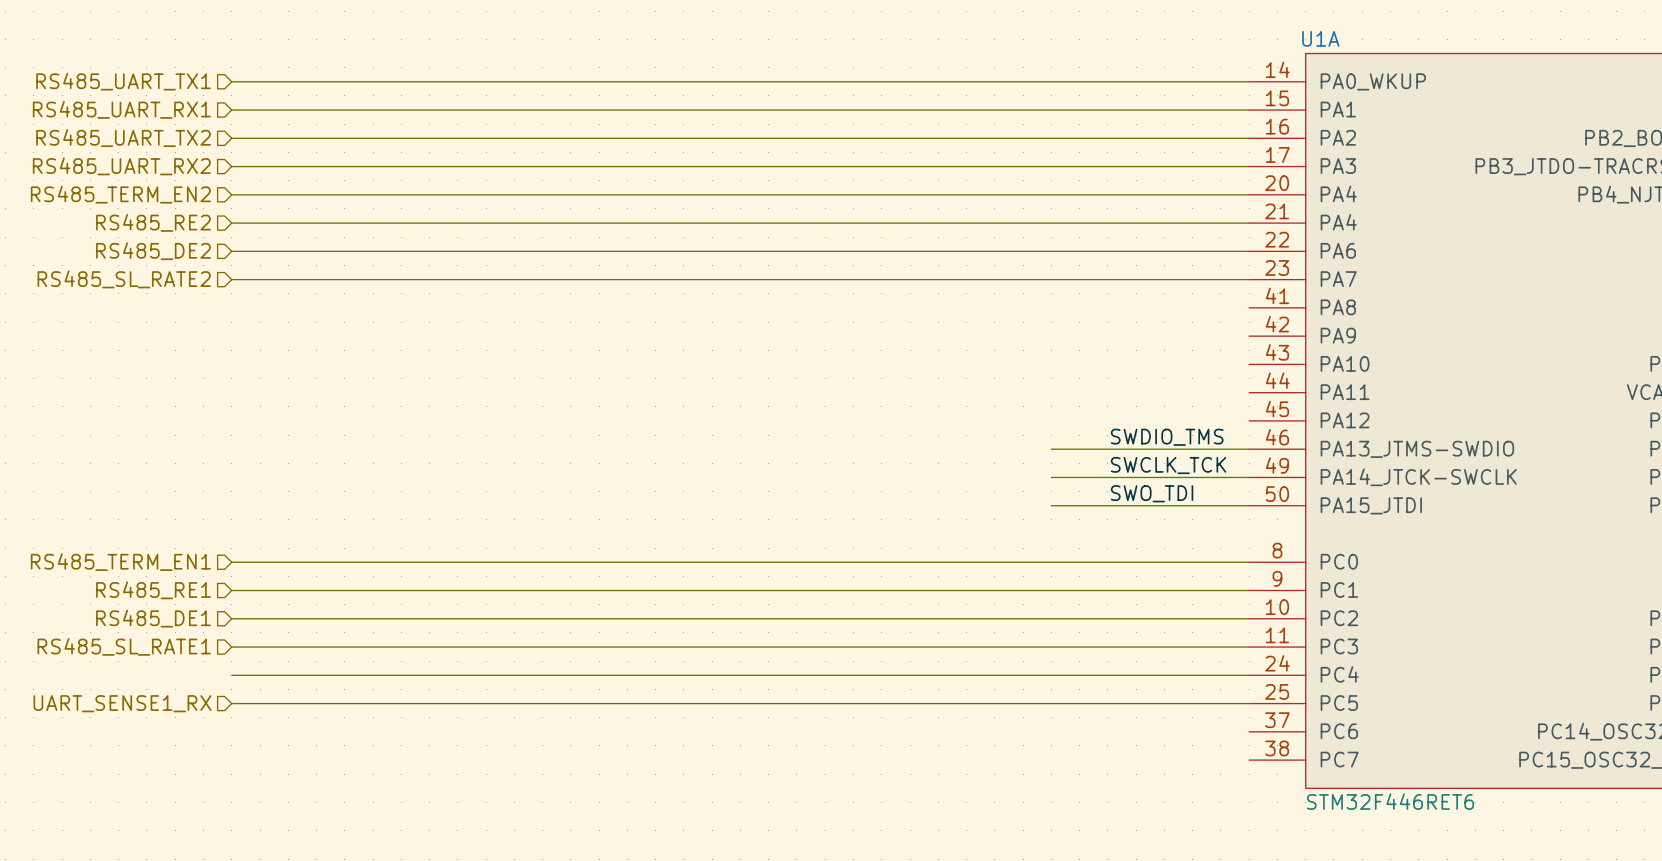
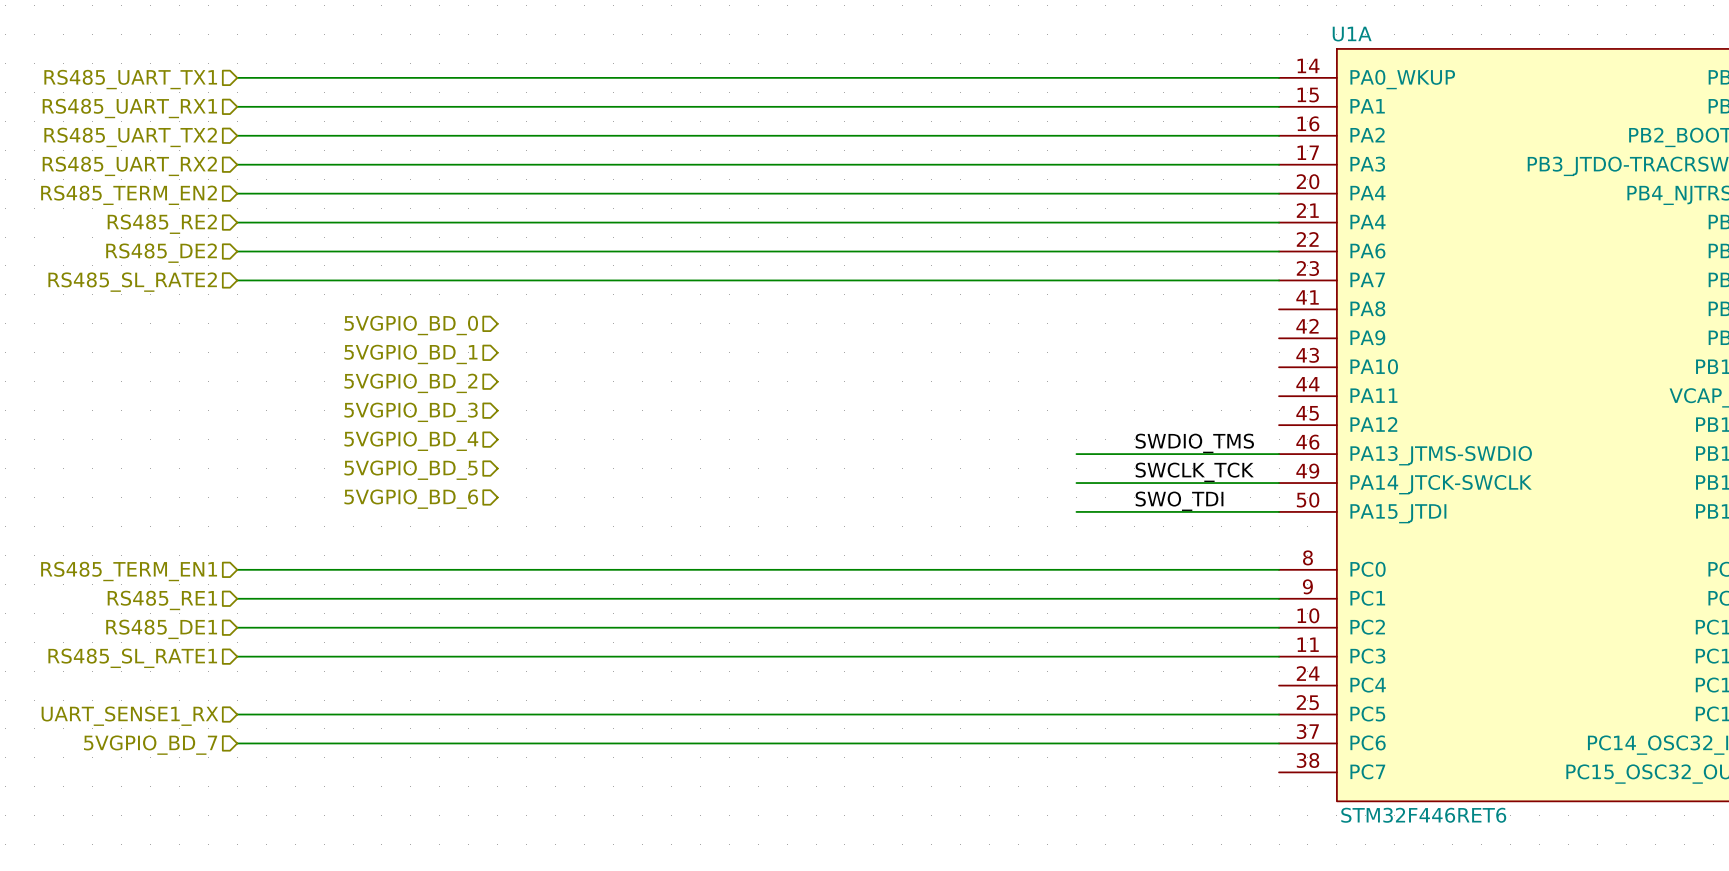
hierarchical label: none -> 5VGPIO_BD_0 (411, 325)
hierarchical label: none -> 5VGPIO_BD_1 (410, 354)
hierarchical label: none -> 5VGPIO_BD_2 (410, 383)
hierarchical label: none -> 5VGPIO_BD_3 (411, 412)
hierarchical label: none -> 5VGPIO_BD_4 (411, 441)
hierarchical label: none -> 5VGPIO_BD_5 (411, 470)
hierarchical label: none -> 5VGPIO_BD_6 (411, 499)
wire: (231, 675) (1249, 675) -> (237, 743) (1279, 743)
hierarchical label: none -> 5VGPIO_BD_7 (150, 745)

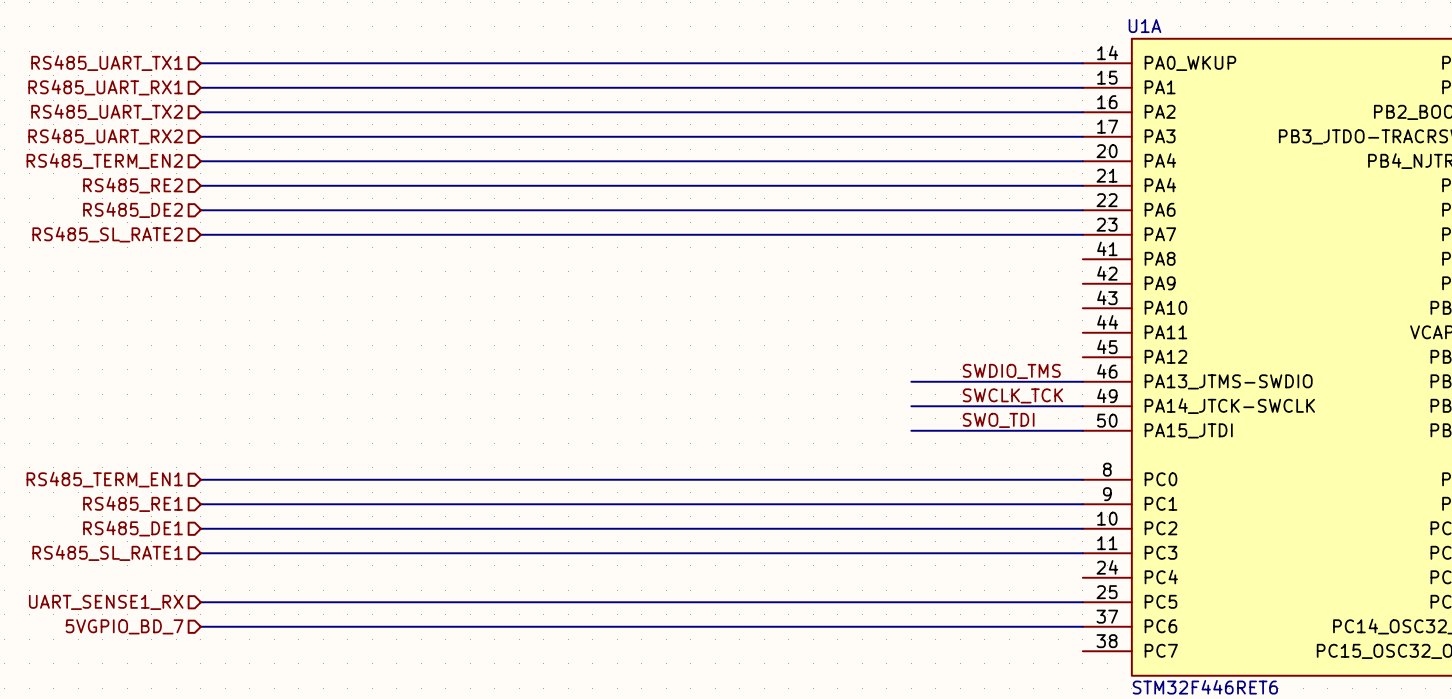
hierarchical label: 5VGPIO_BD_0 (411, 325) -> none
hierarchical label: 5VGPIO_BD_1 (410, 354) -> none
hierarchical label: 5VGPIO_BD_2 (410, 383) -> none
hierarchical label: 5VGPIO_BD_3 (411, 412) -> none
hierarchical label: 5VGPIO_BD_4 (411, 441) -> none
hierarchical label: 5VGPIO_BD_5 (411, 470) -> none
hierarchical label: 5VGPIO_BD_6 (411, 499) -> none

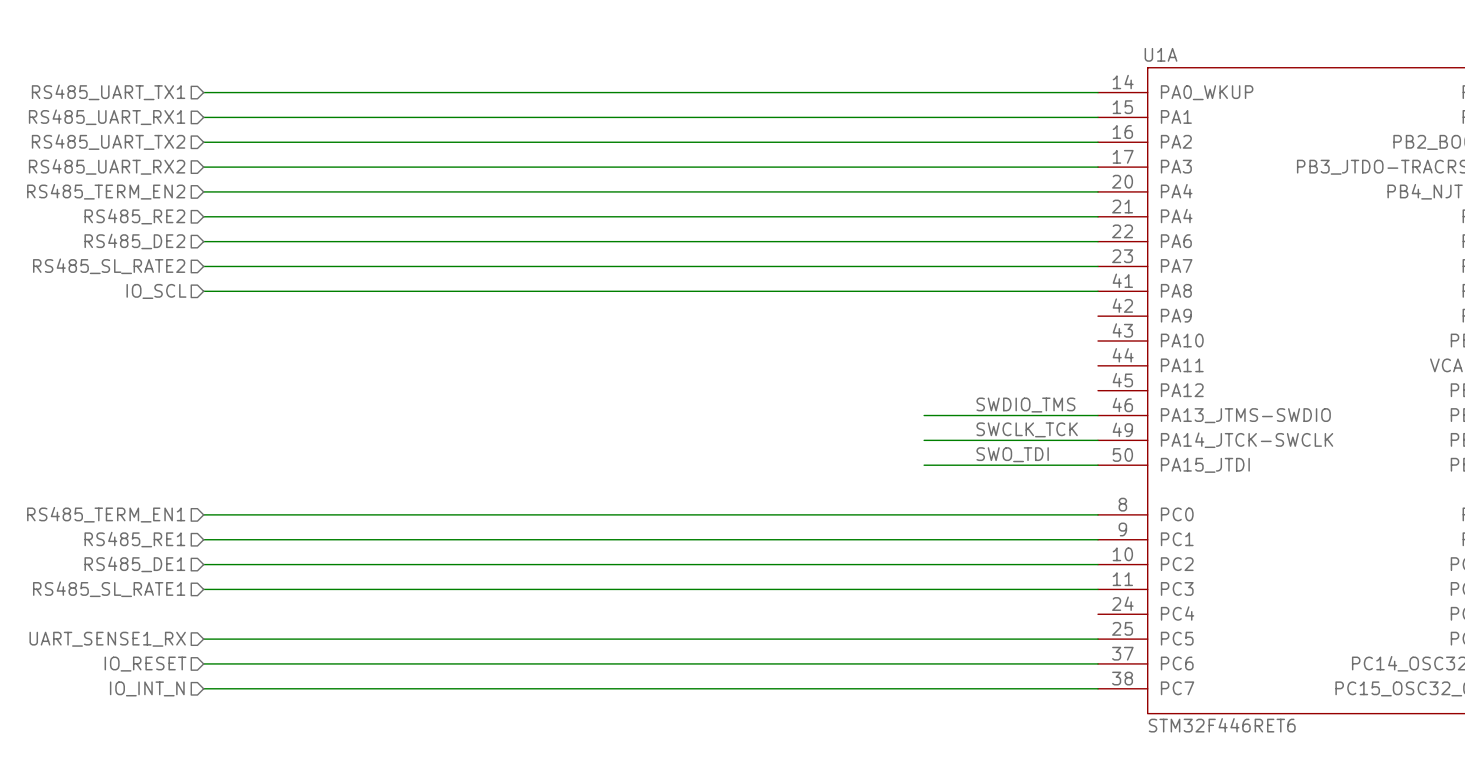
hierarchical label: none -> IO_SCL (156, 291)
wire: none -> (203, 291) (1098, 291)
hierarchical label: 5VGPIO_BD_7 (124, 626) -> IO_RESET (145, 664)
hierarchical label: none -> IO_INT_N (147, 688)
wire: none -> (203, 688) (1098, 688)

